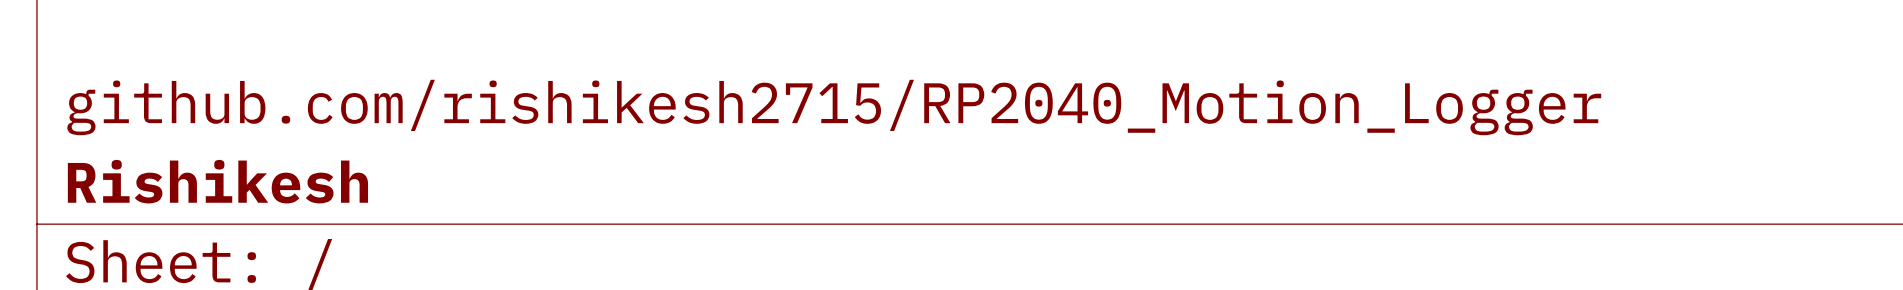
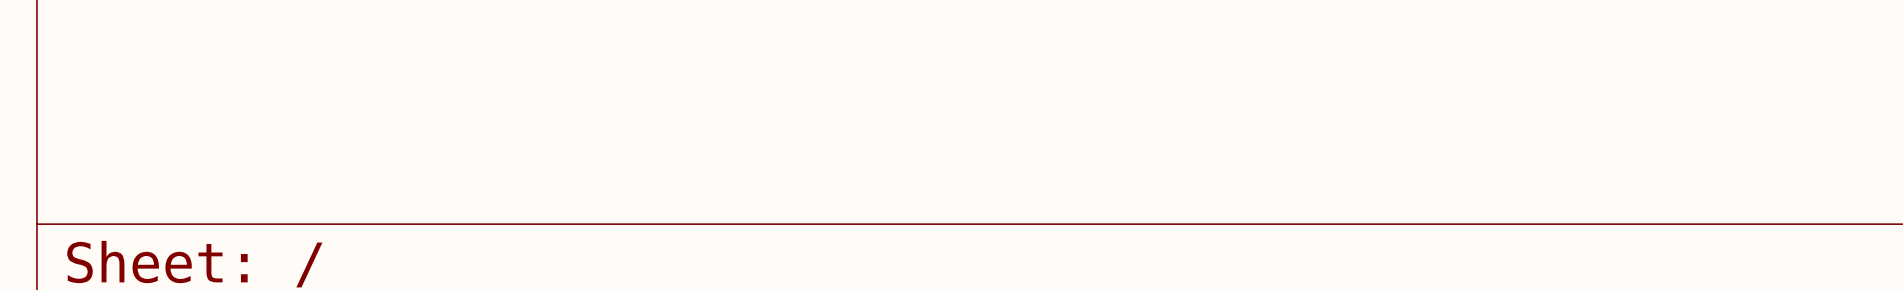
title block: github.com/rishikesh2715/RP2040_Motion_Logger (834, 107) -> none
title block: Rishikesh (217, 181) -> none

